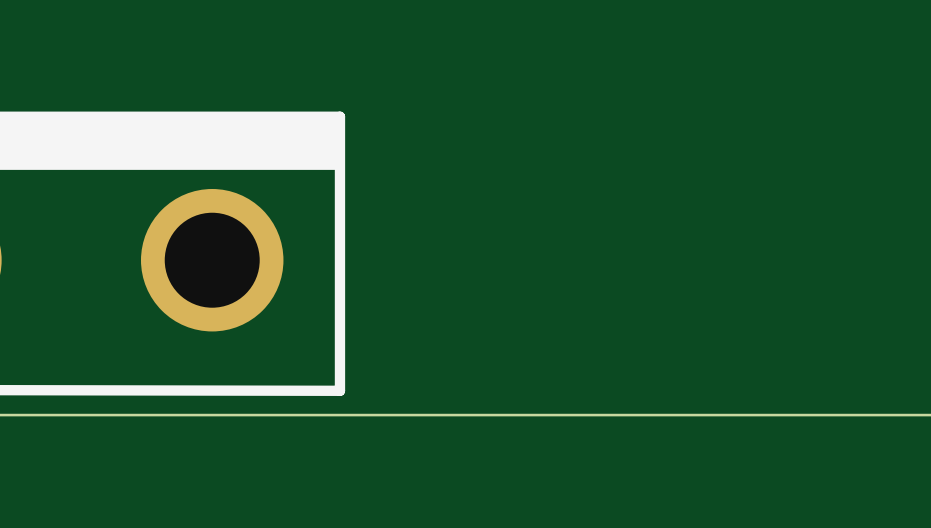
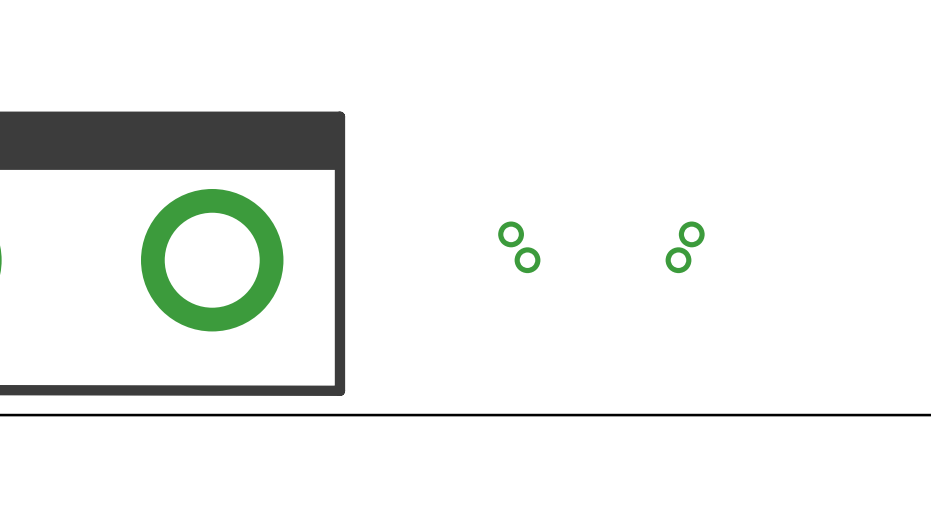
via: none -> (511, 234)
via: none -> (691, 234)
via: none -> (527, 260)
via: none -> (678, 260)

